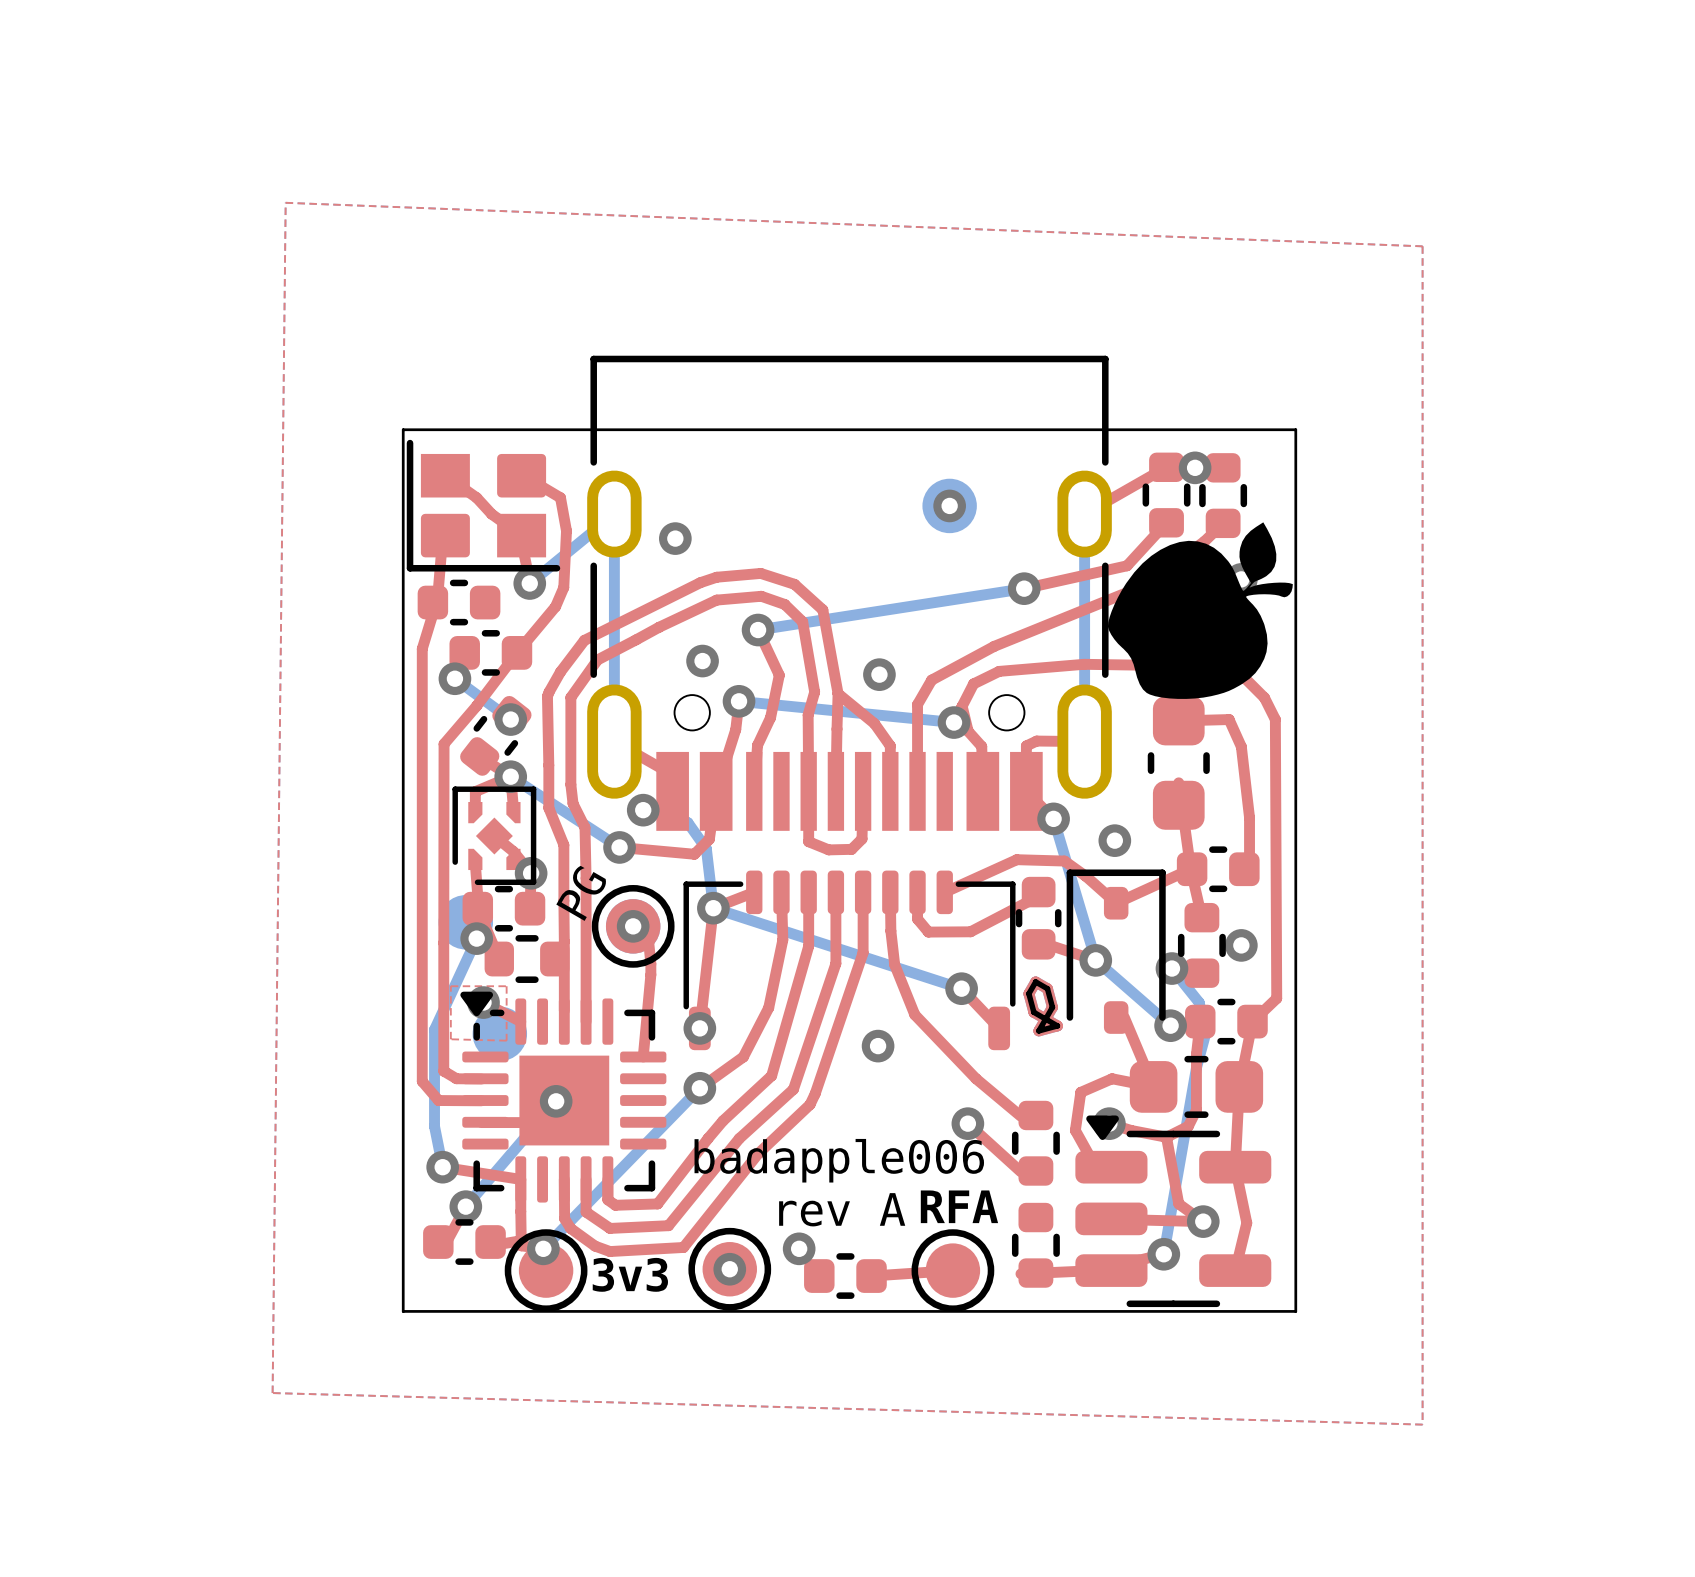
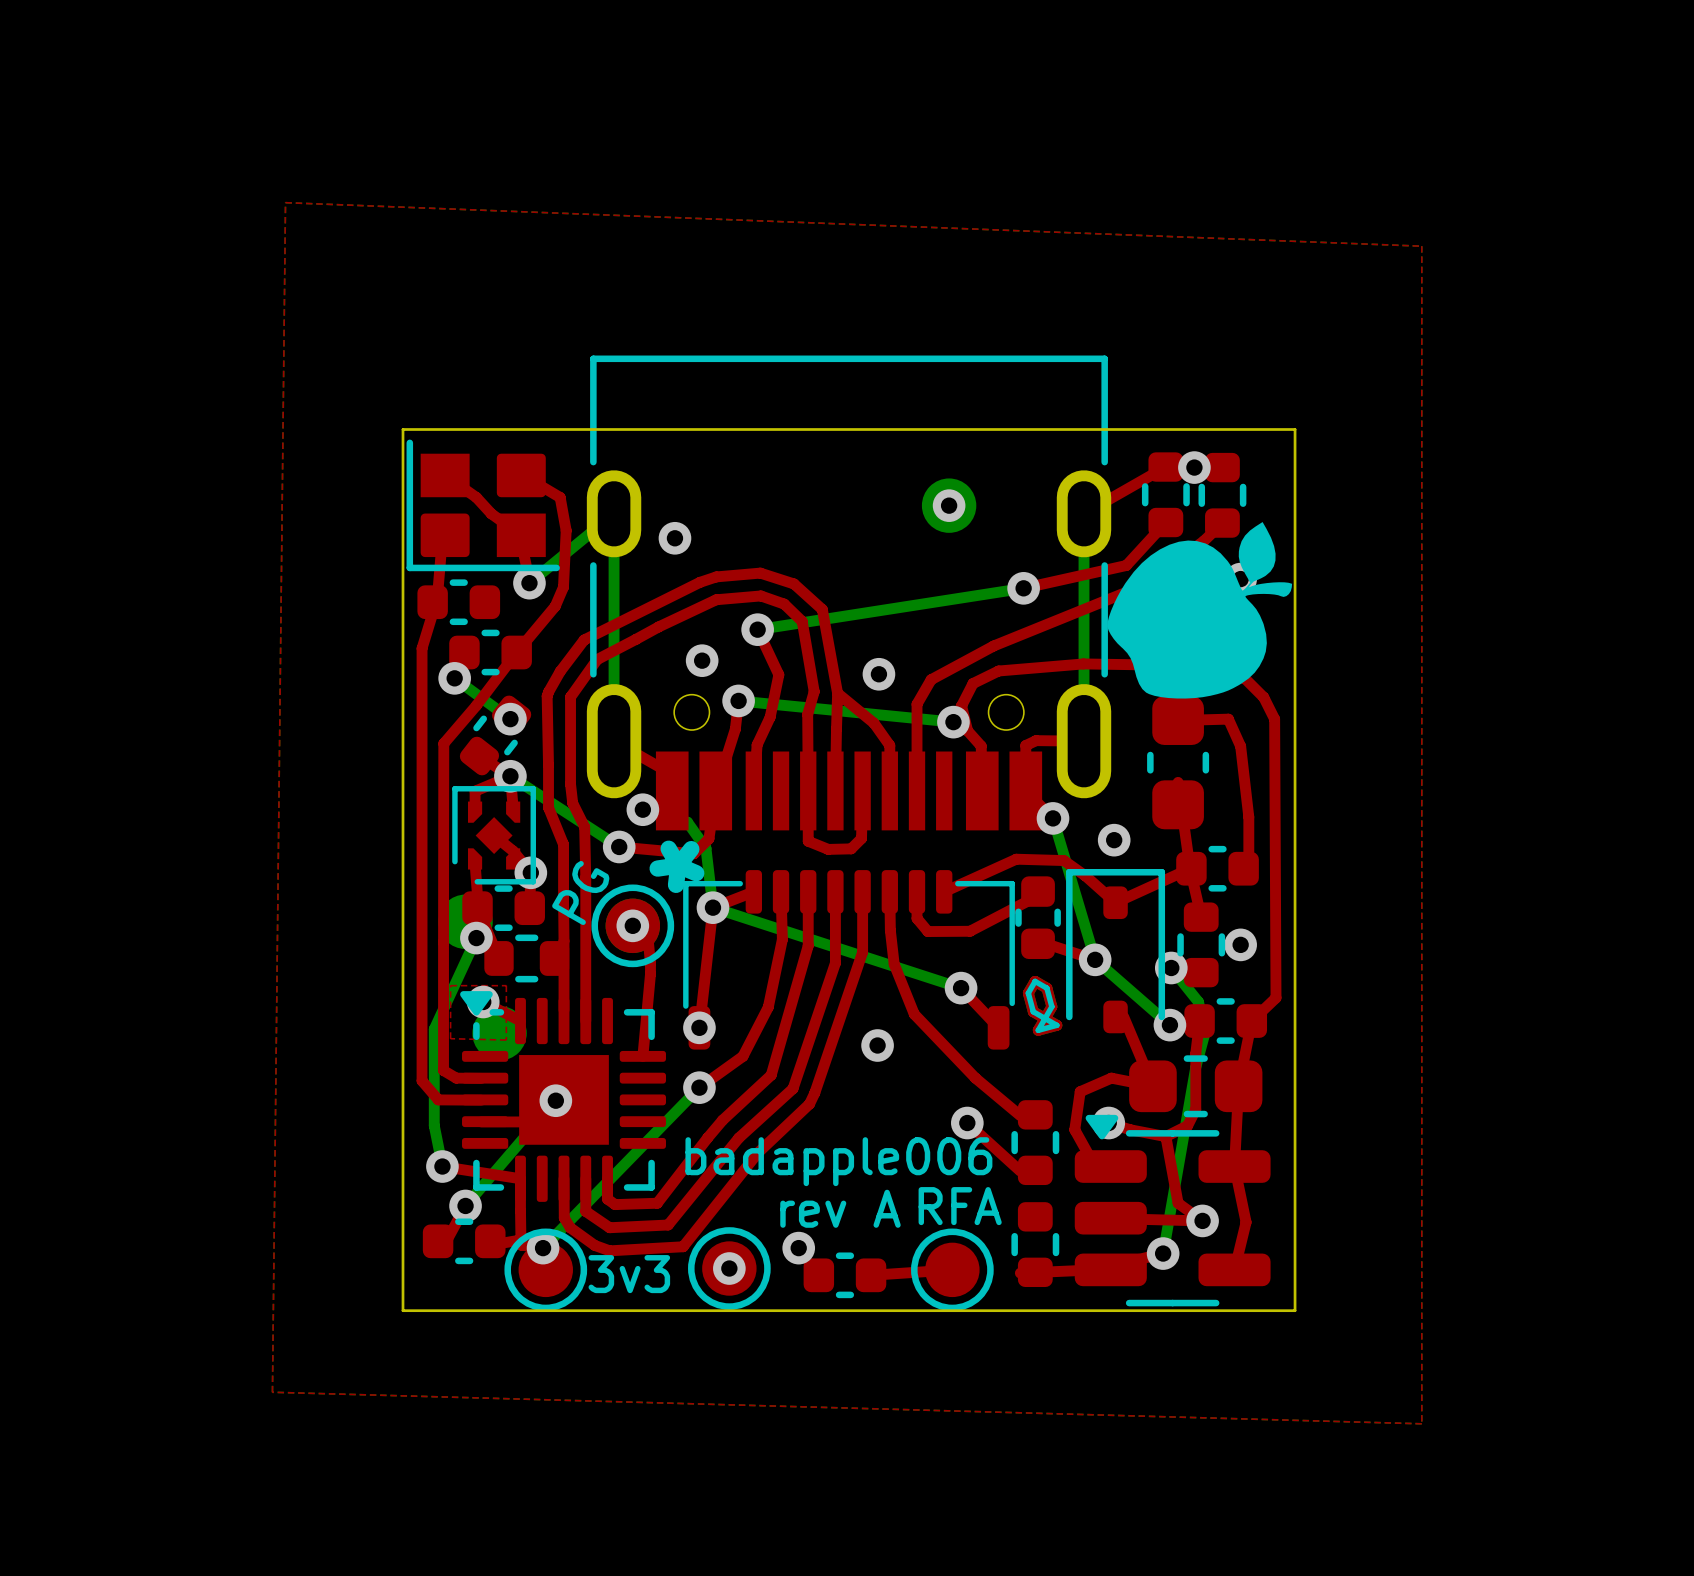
text: none -> * (676, 866)

